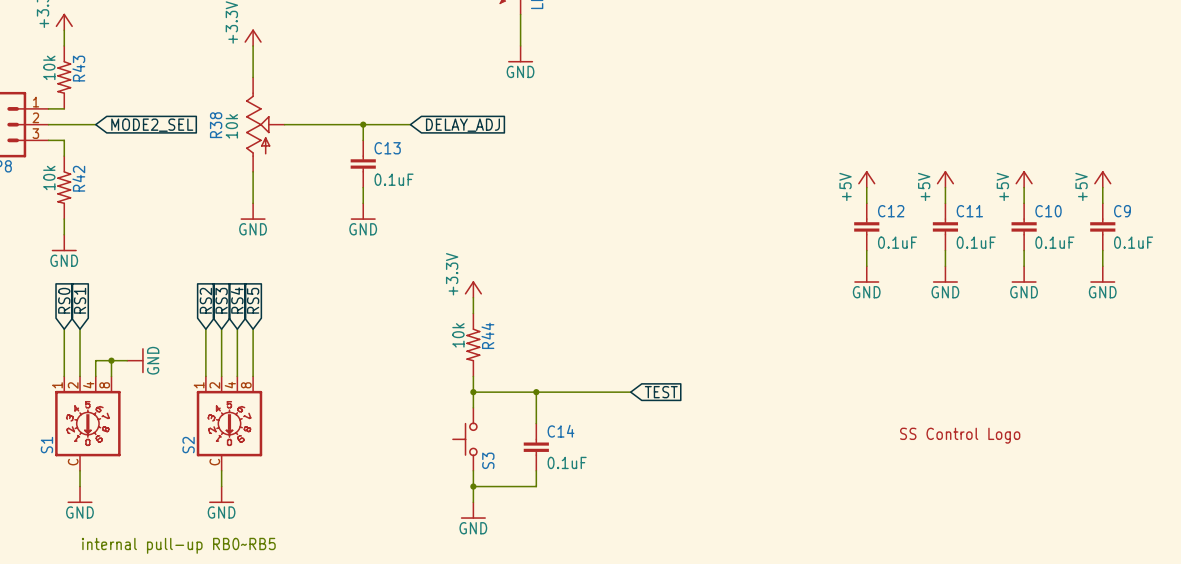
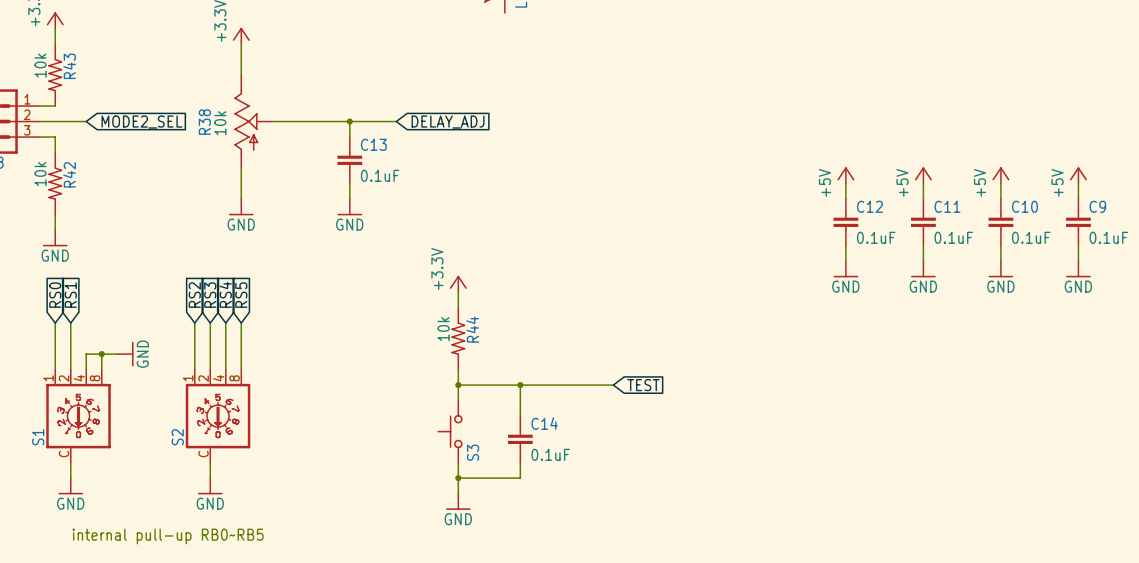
wire: (520, 14) (520, 45) -> none
power symbol: GND (520, 54) -> none
part: (960, 435) -> none

